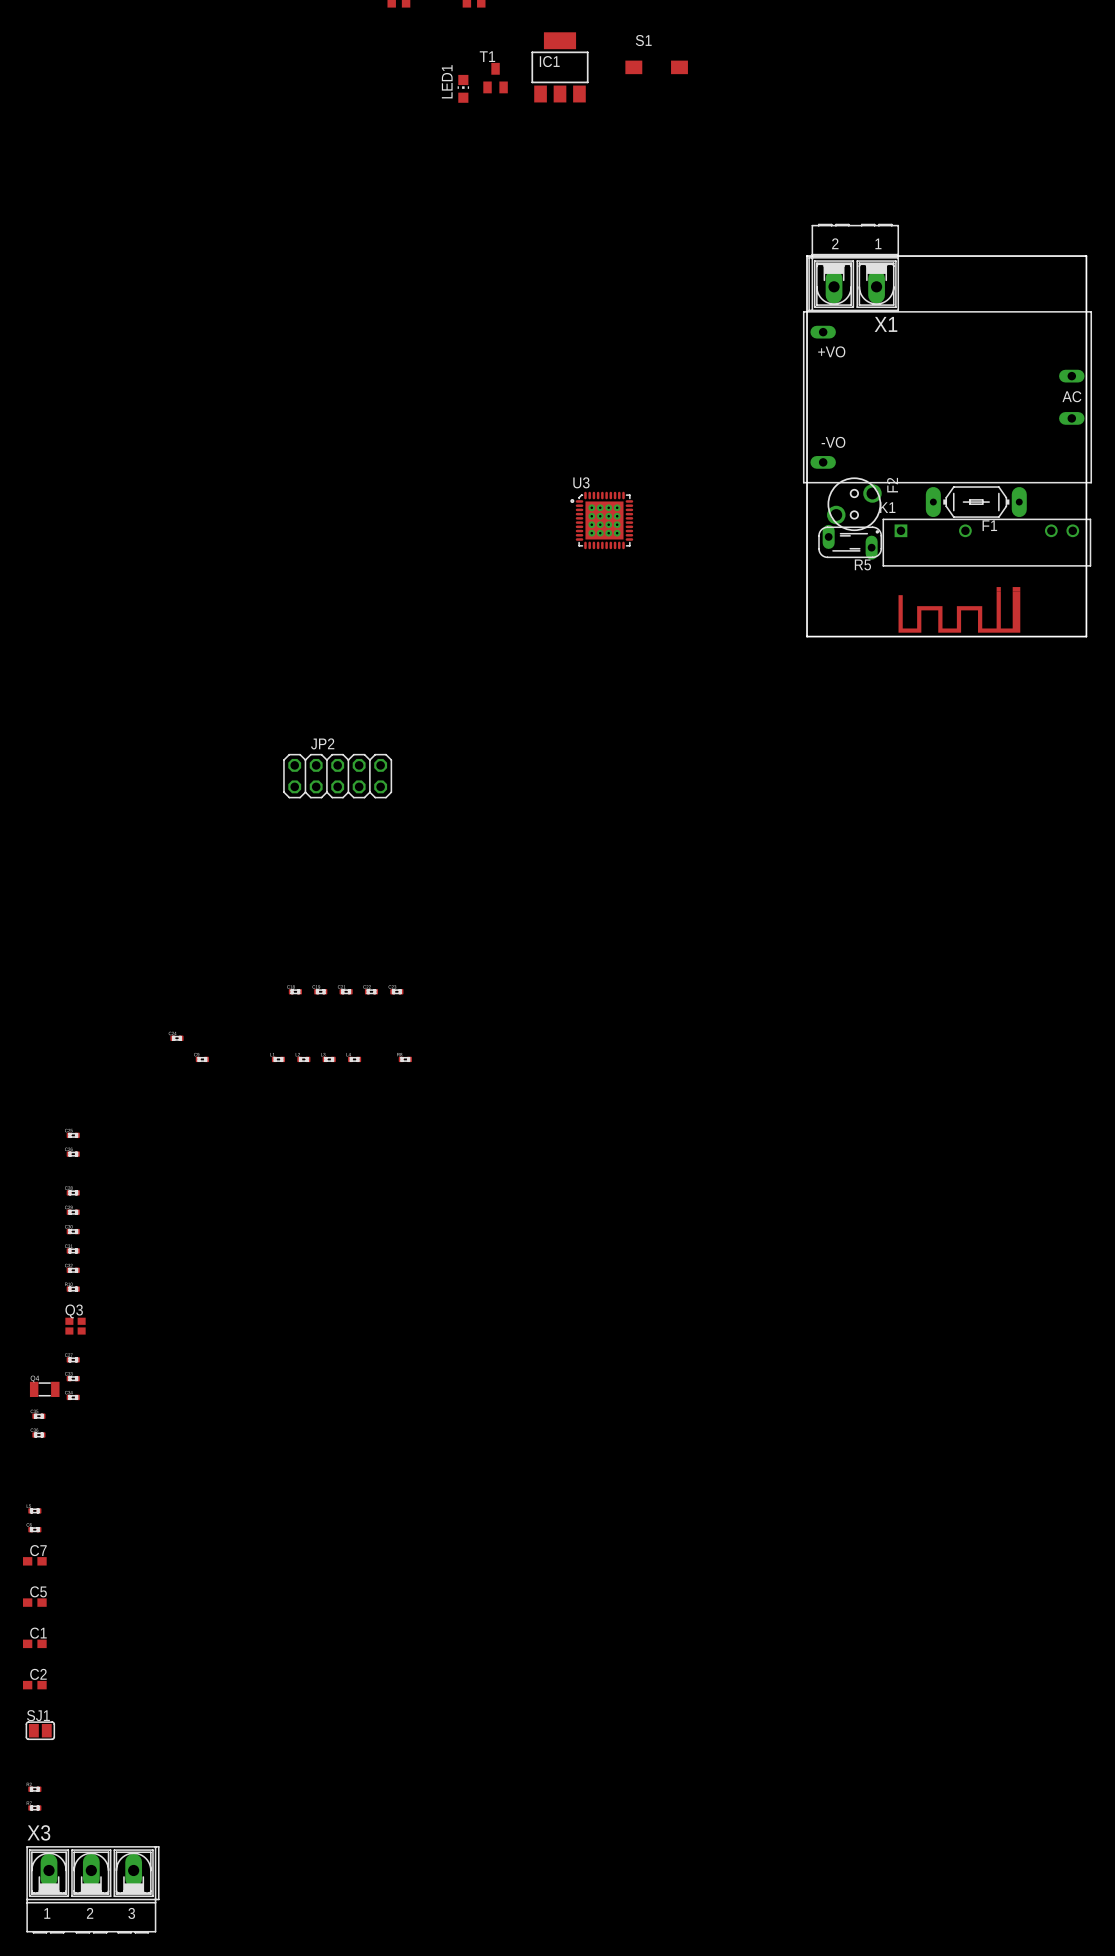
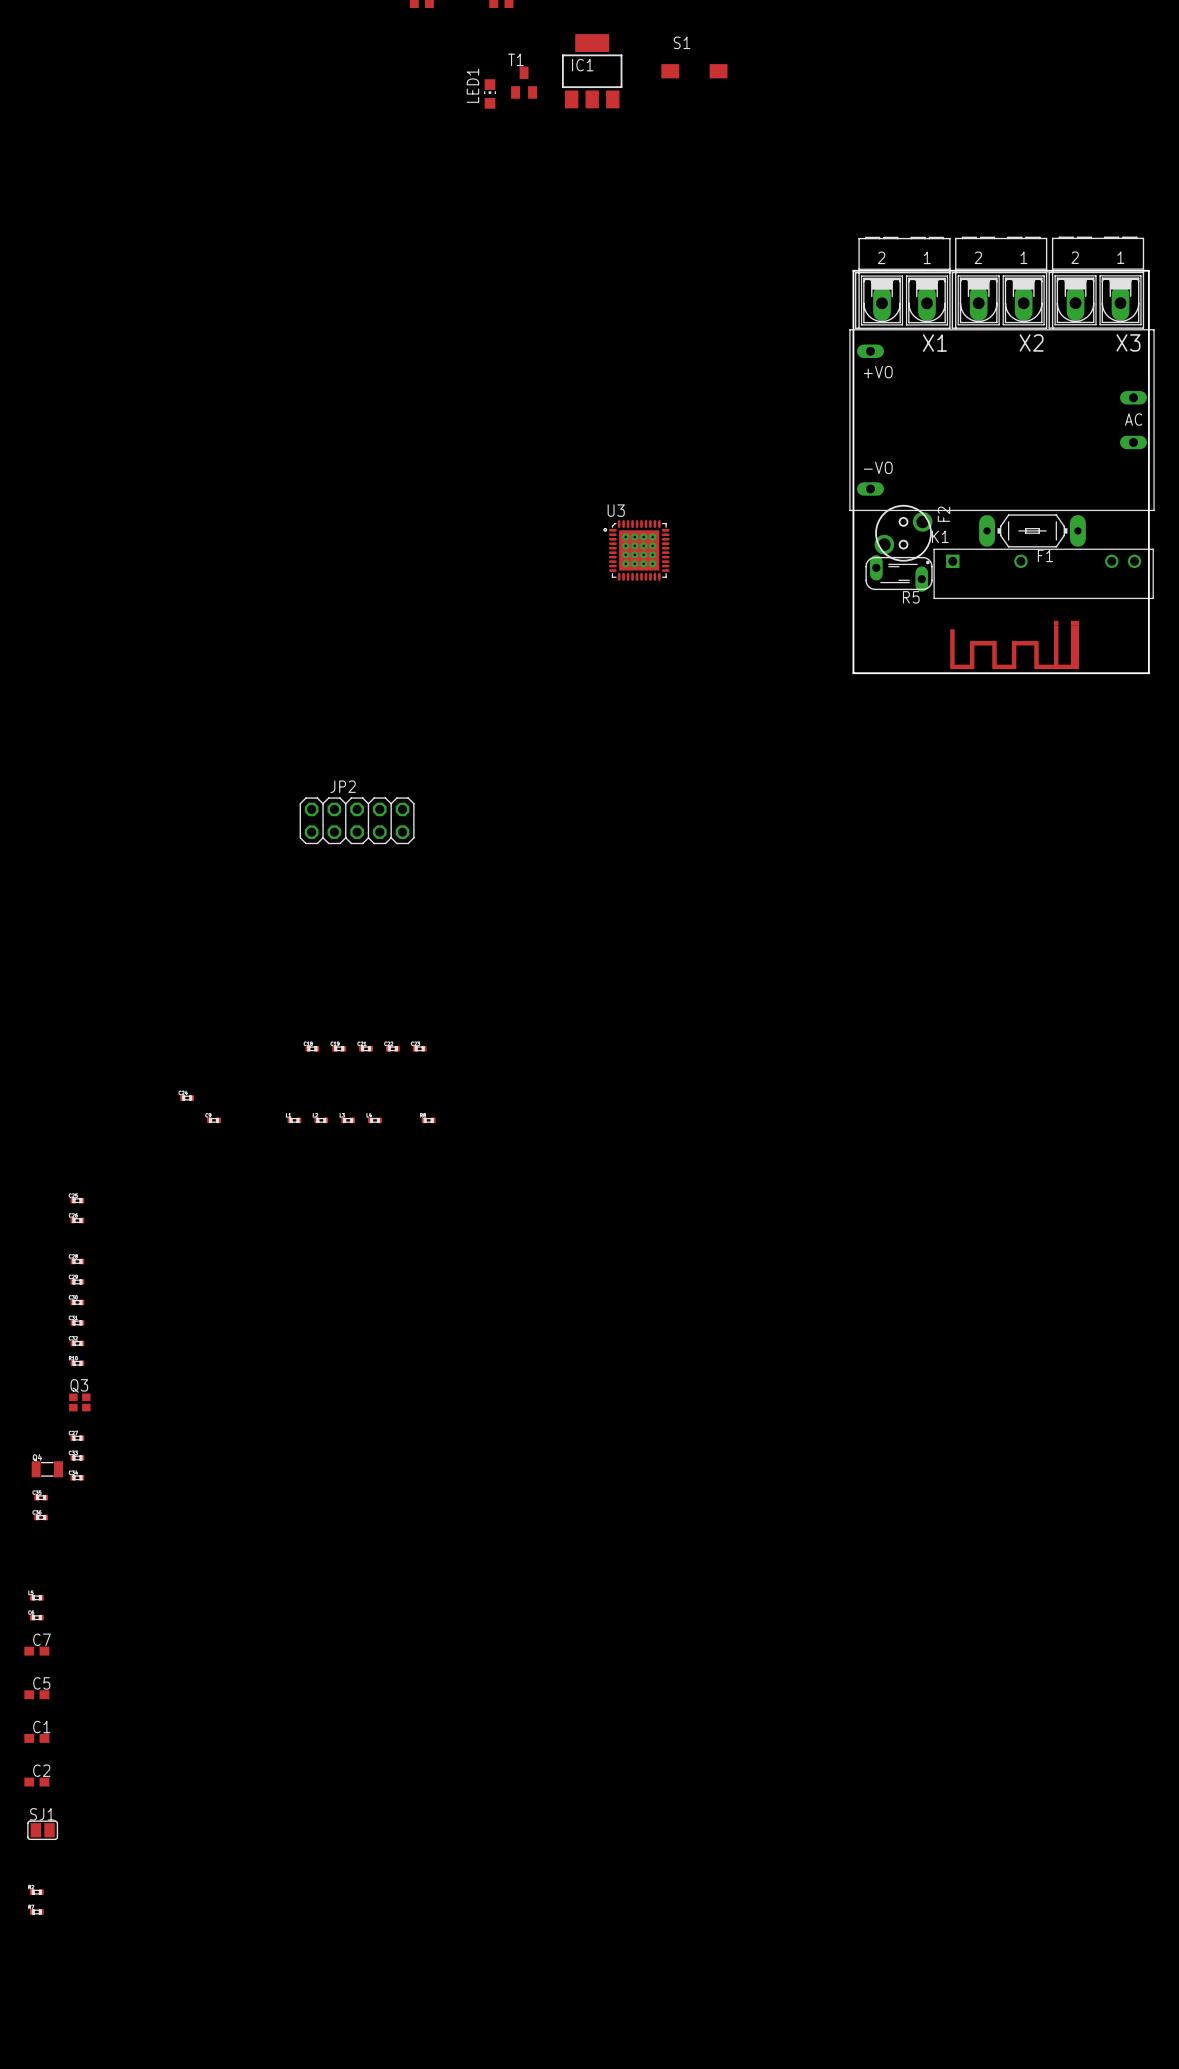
X2: none -> (999, 282)
X3 name position: X3 (38, 1832) -> X3 (1128, 342)
X3 footprint: [26, 1846, 160, 1934] -> [1048, 236, 1145, 329]

